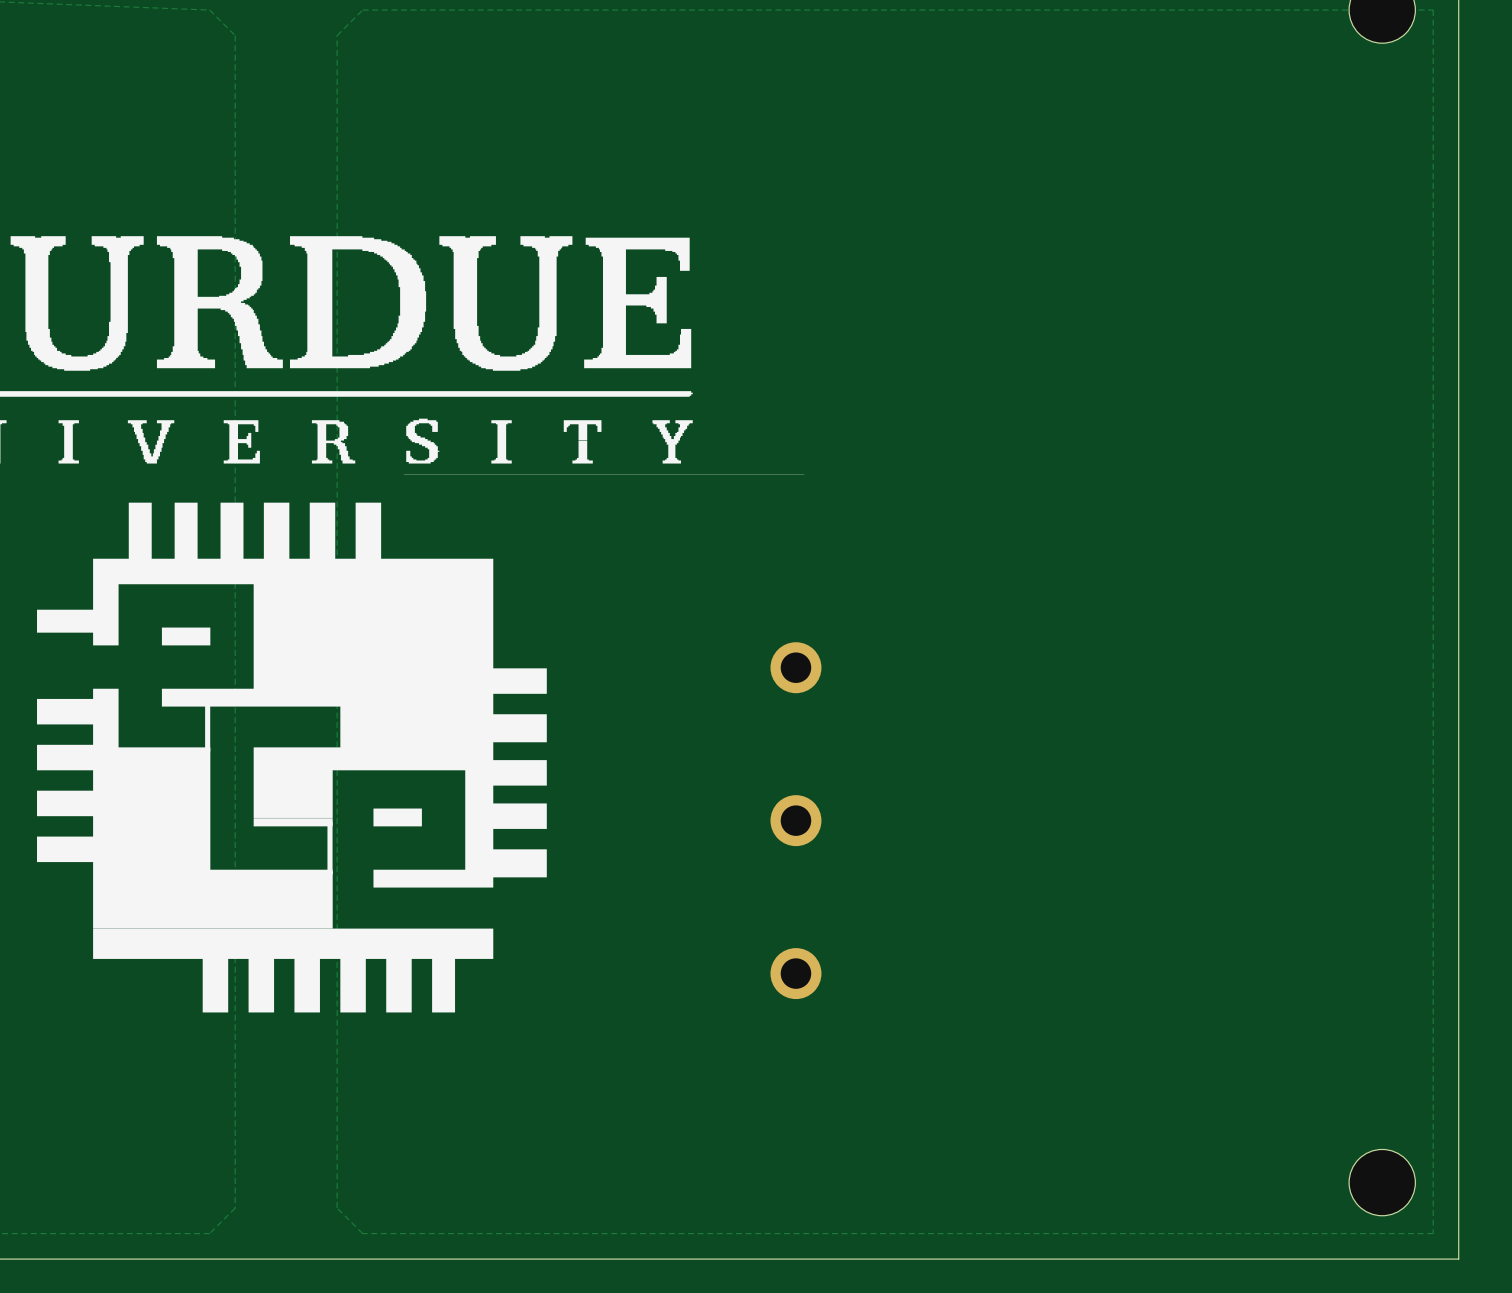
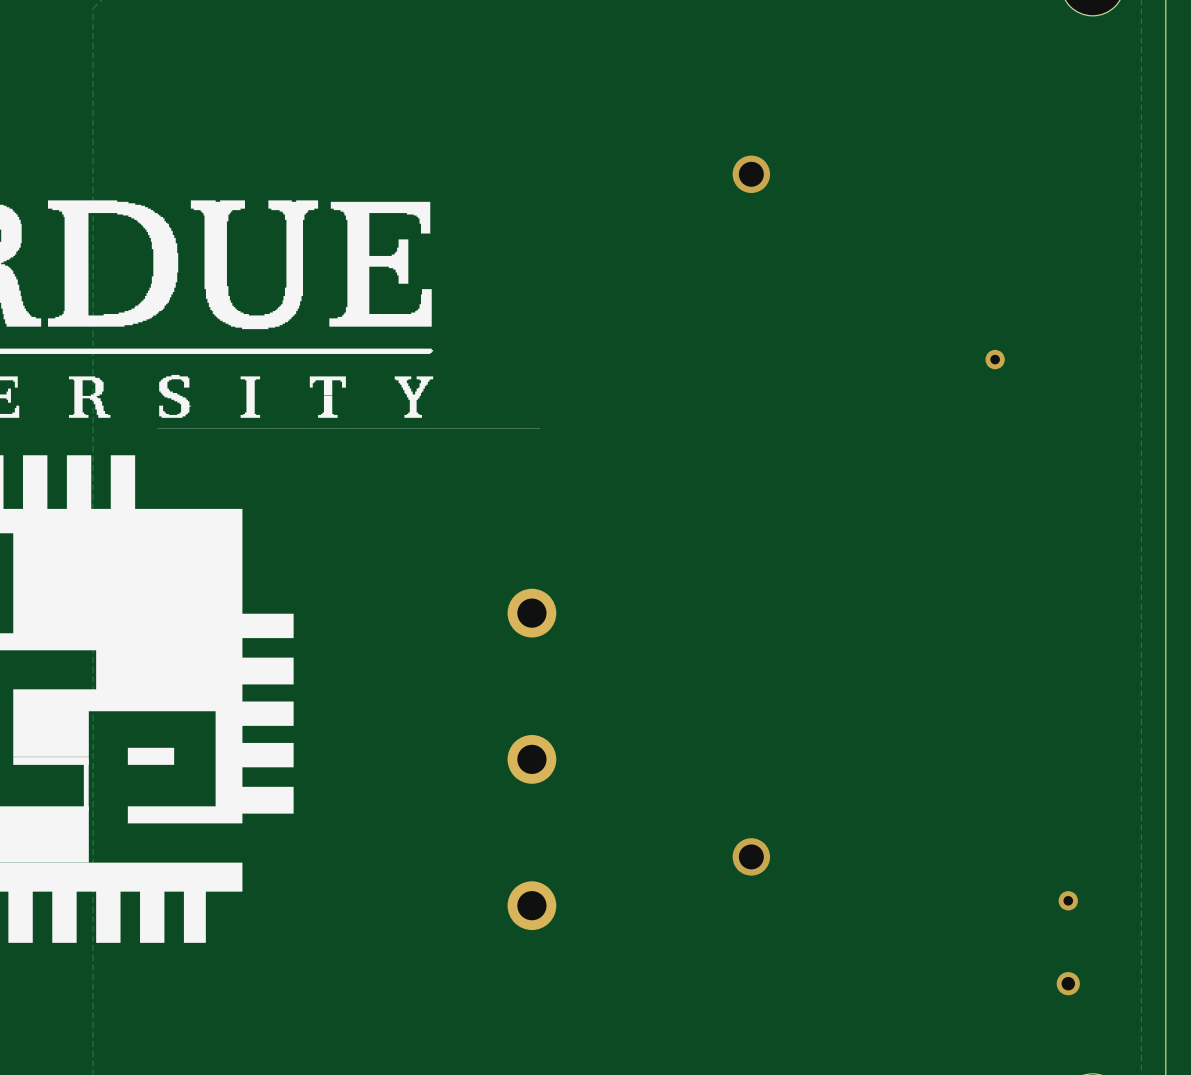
via: none -> (751, 174)
via: none -> (995, 359)
via: none -> (751, 856)
via: none -> (1068, 900)
via: none -> (1068, 983)

